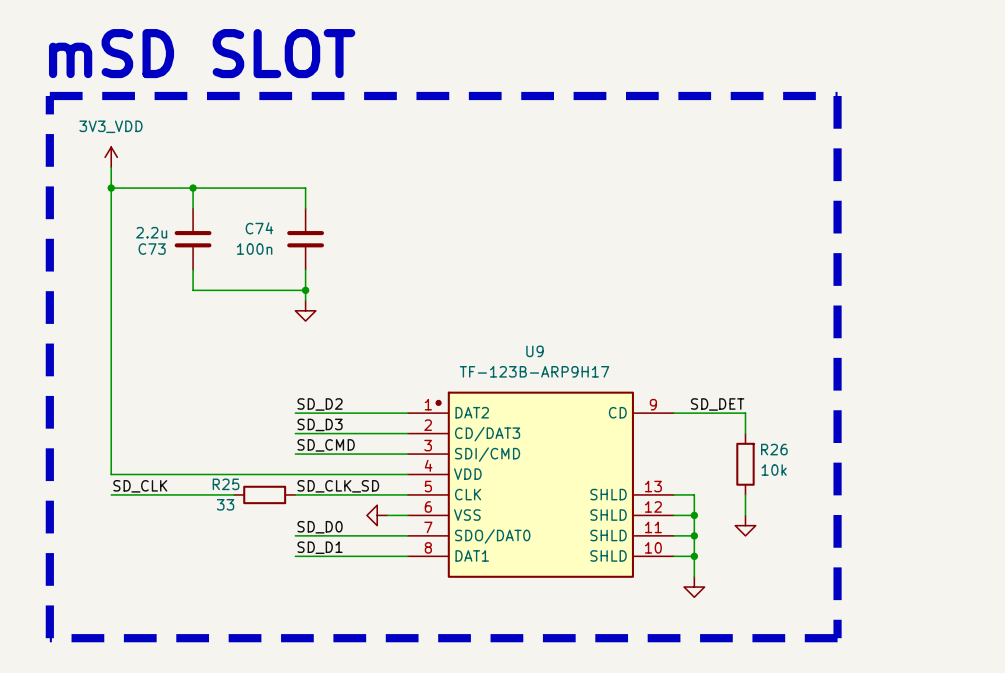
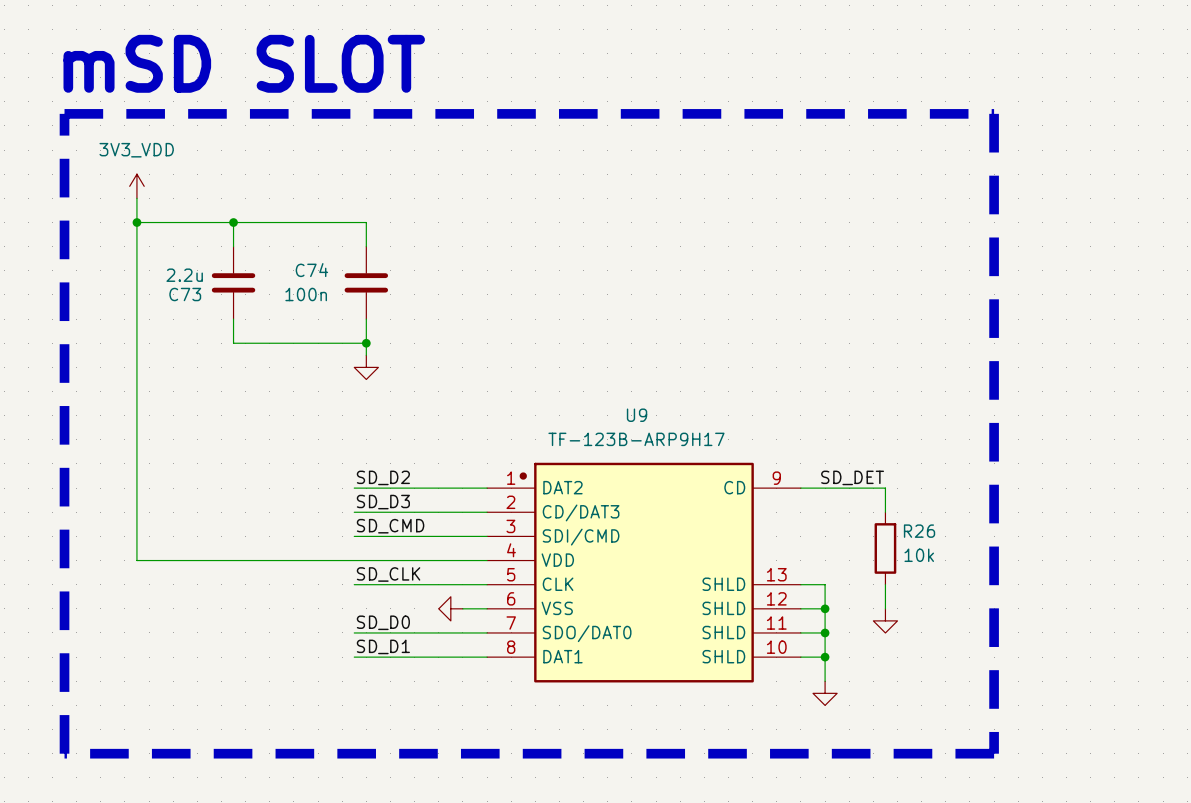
label: SD_CLK (140, 486) -> none
label: SD_CLK_SD (338, 486) -> SD_CLK (388, 574)
wire: (111, 494) (233, 494) -> none
R25: 33 (264, 494) -> none

